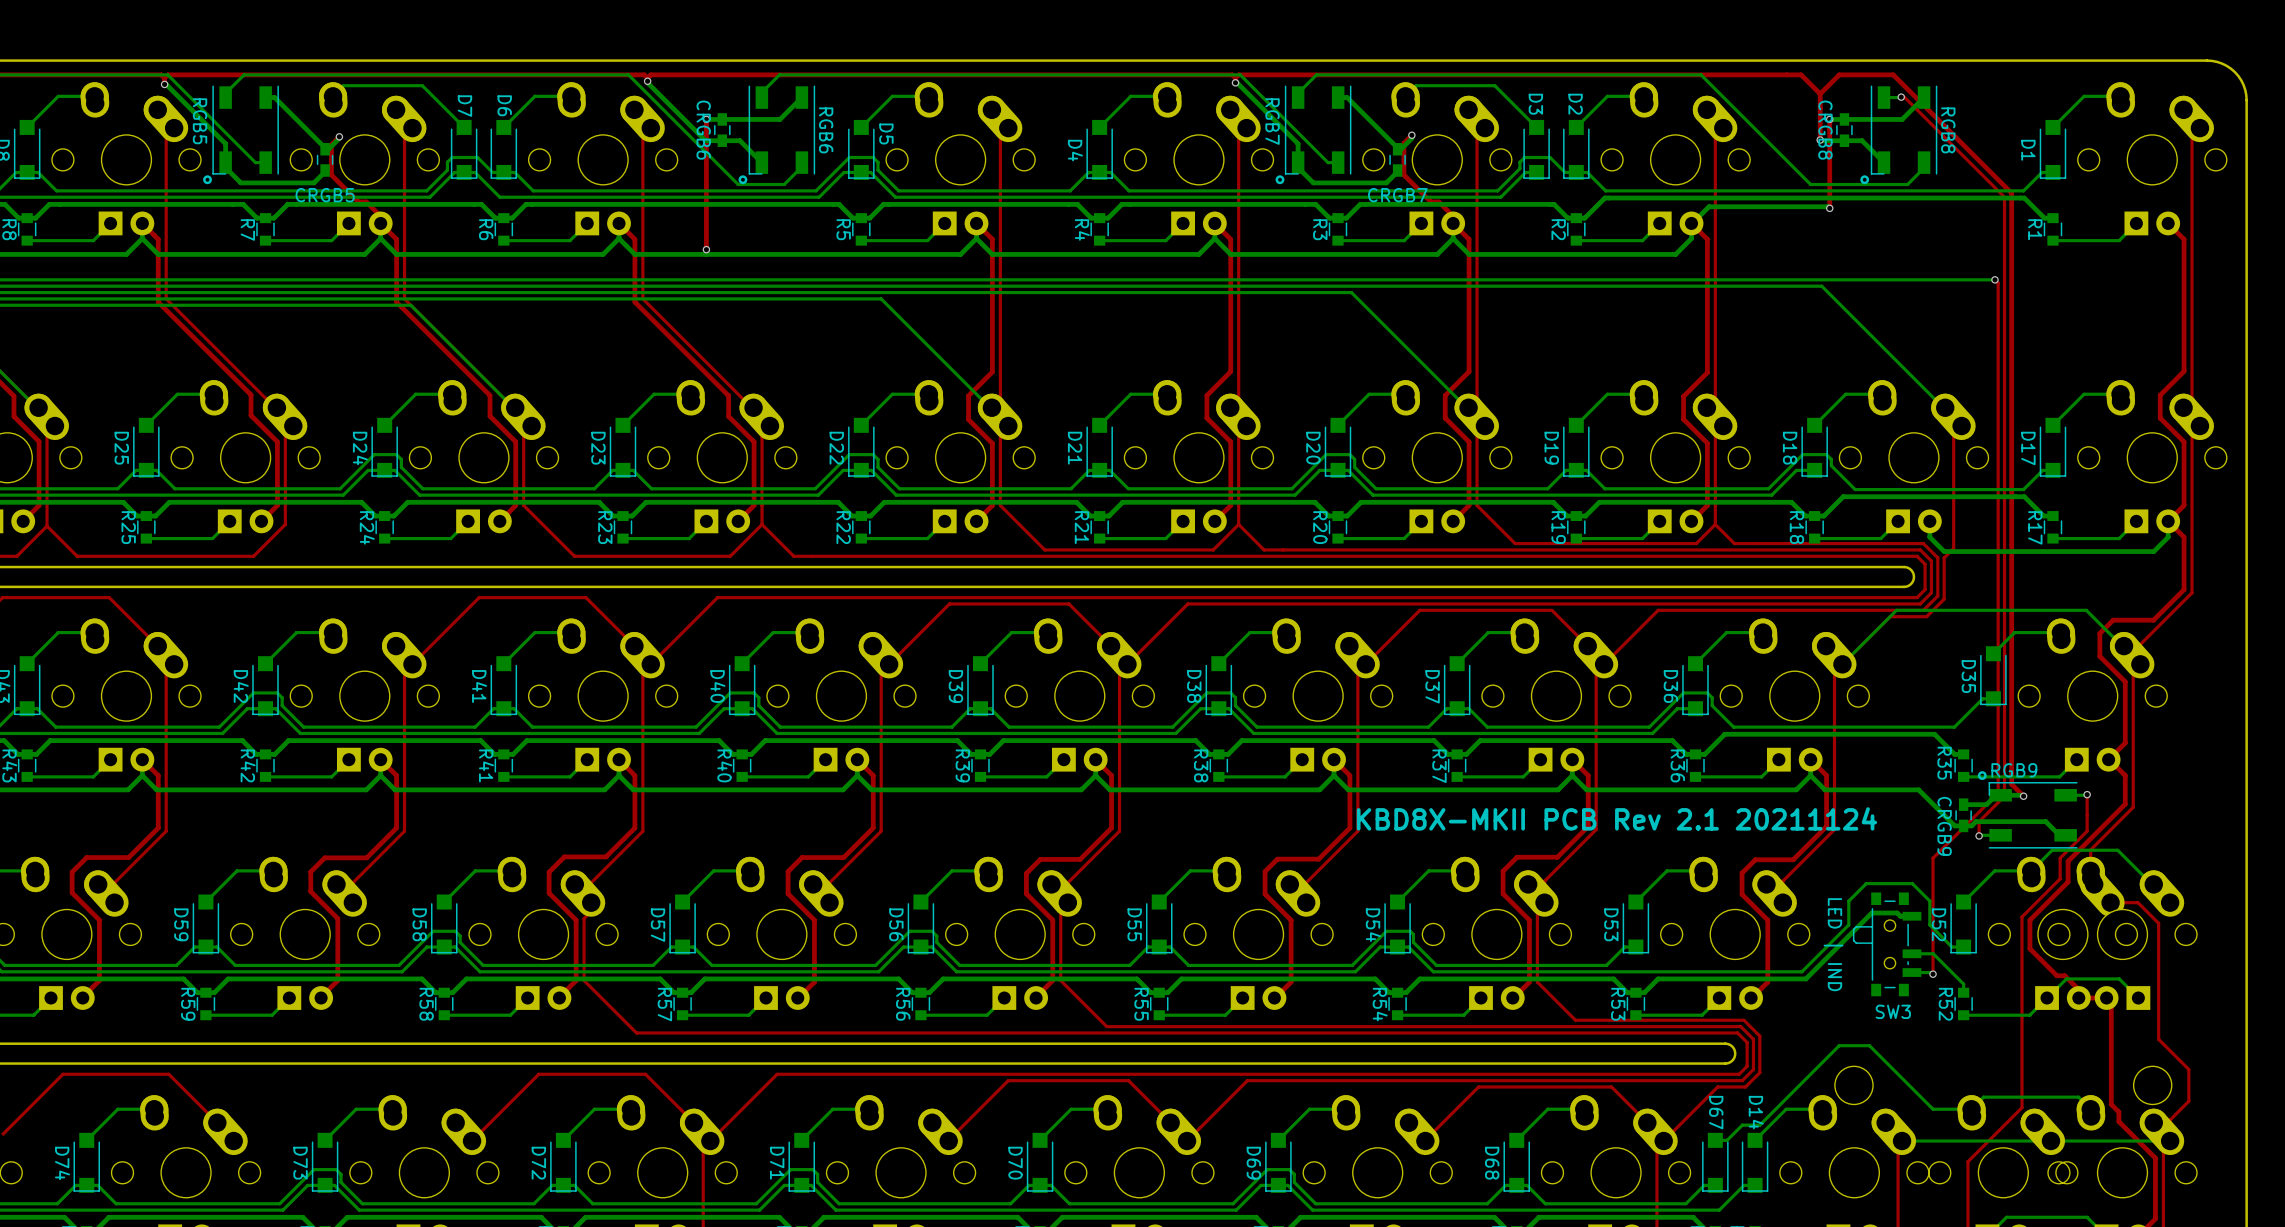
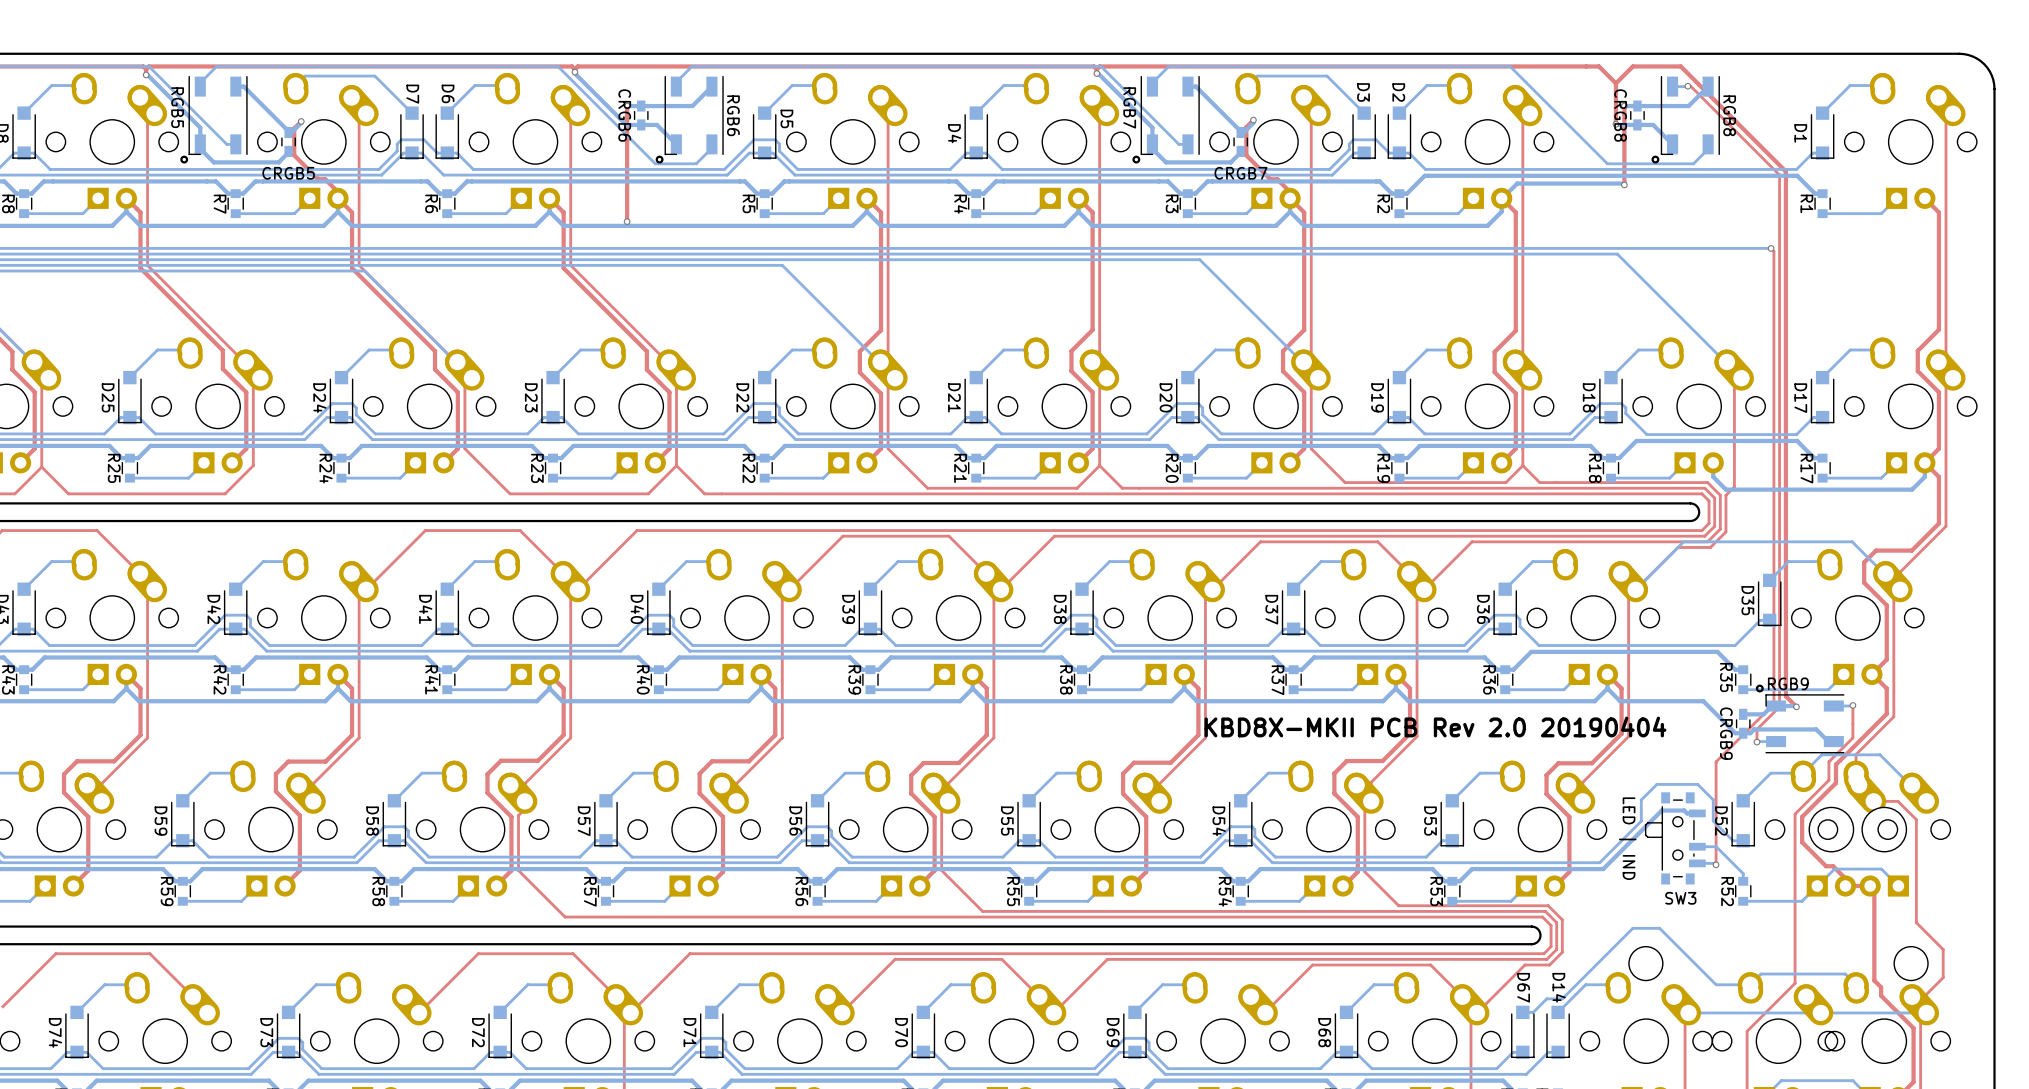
text: KBD8X-MKII PCB Rev 2.1 20211124 (1616, 818) -> KBD8X-MKII PCB Rev 2.0 20190404 (1435, 727)

